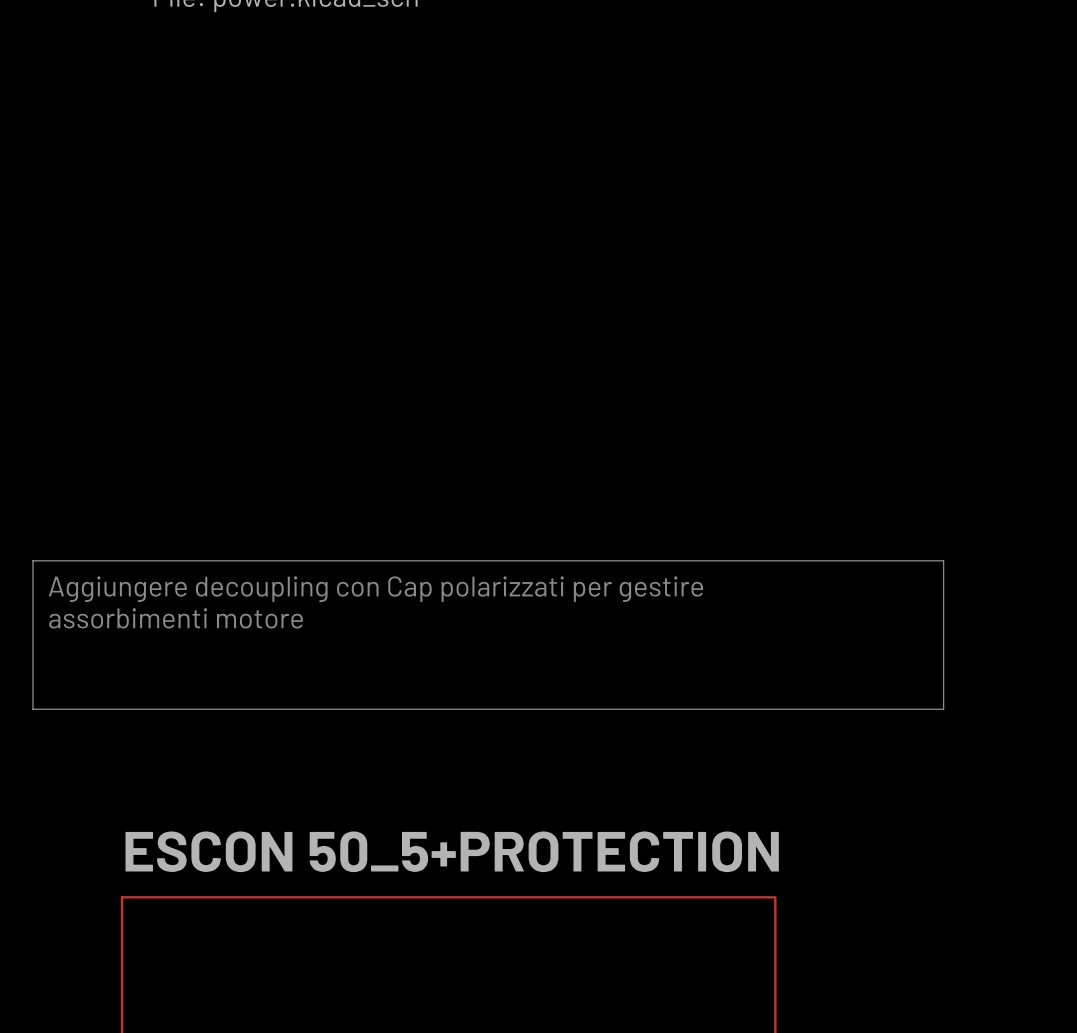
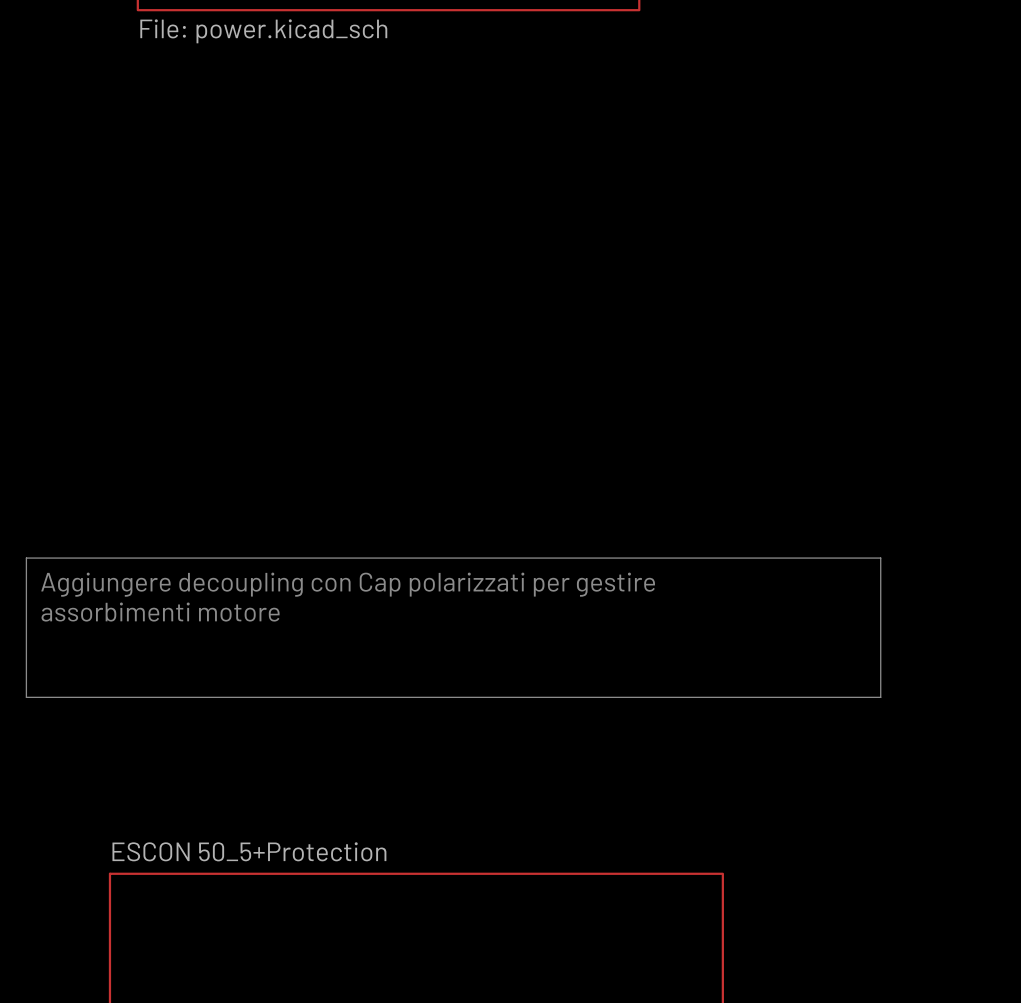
sheet ESCON 50_5+PROTECTION name: ESCON 50_5+PROTECTION (452, 851) -> ESCON 50_5+Protection (249, 851)

